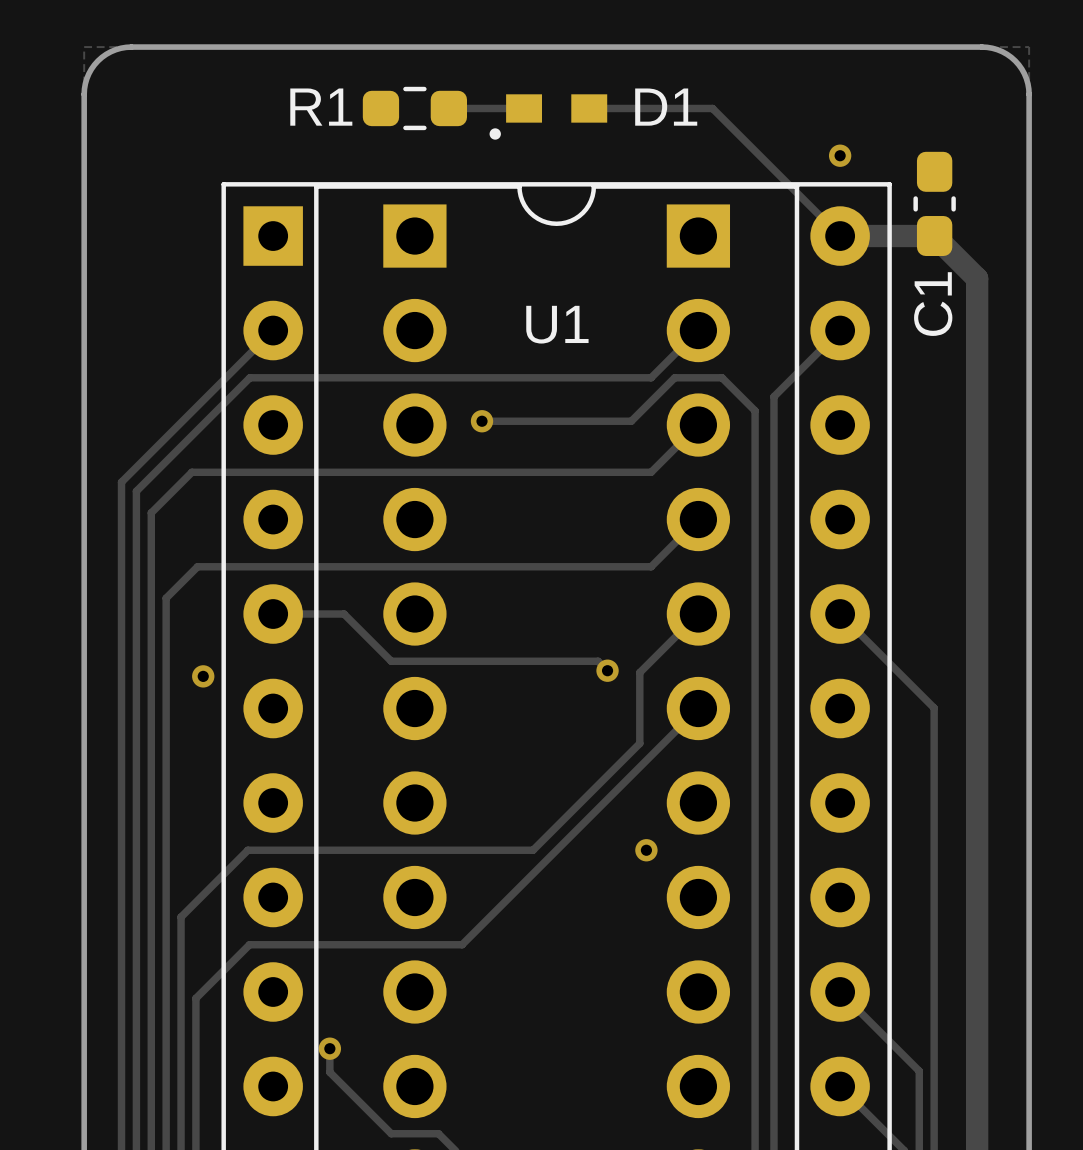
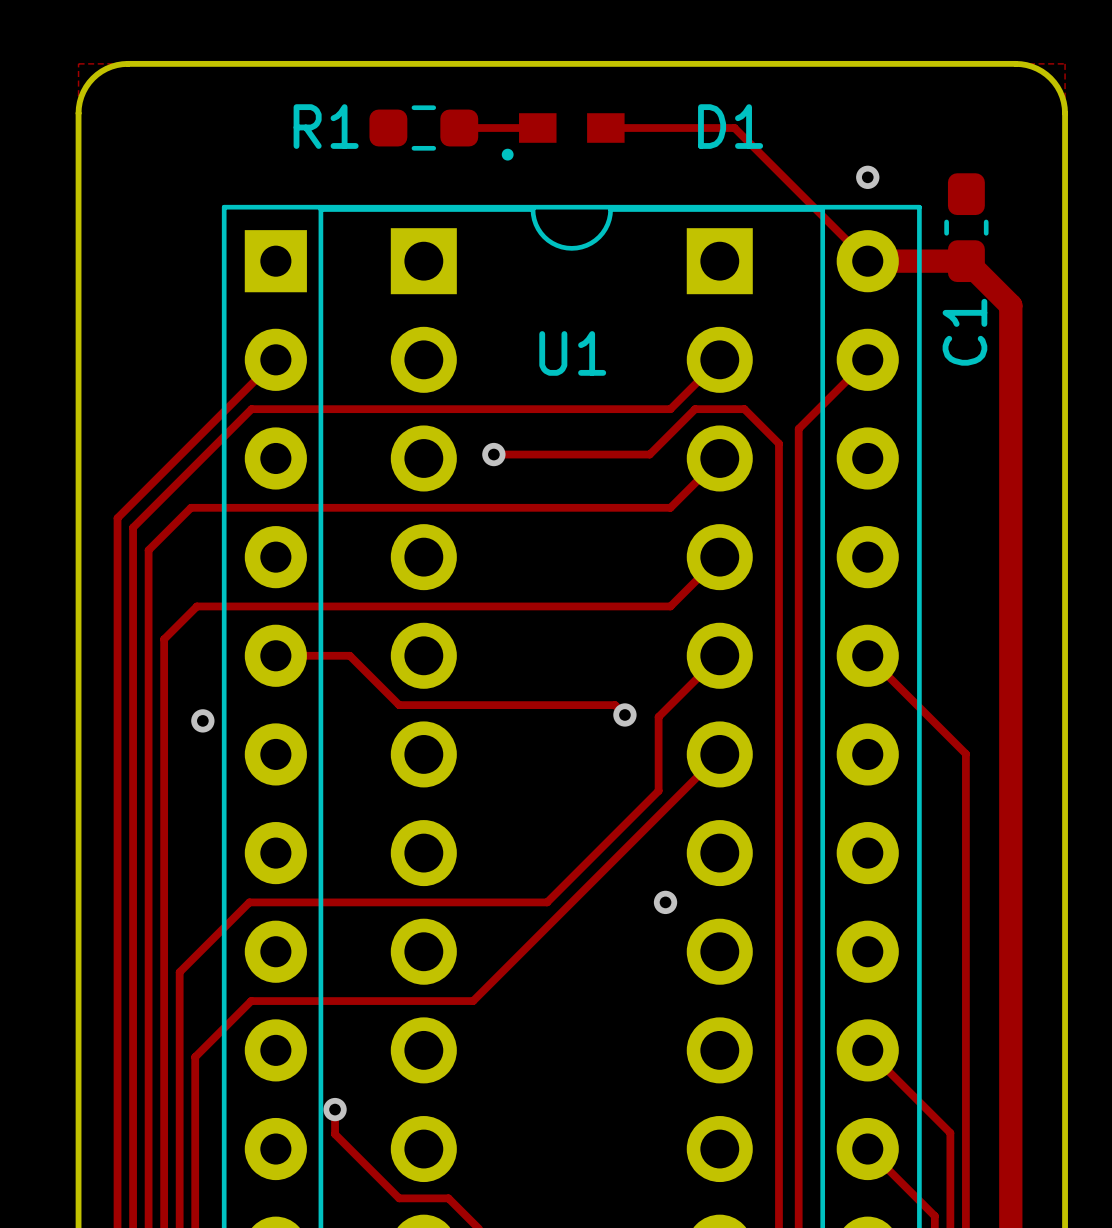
D1 name position: D1 (666, 107) -> D1 (730, 126)

